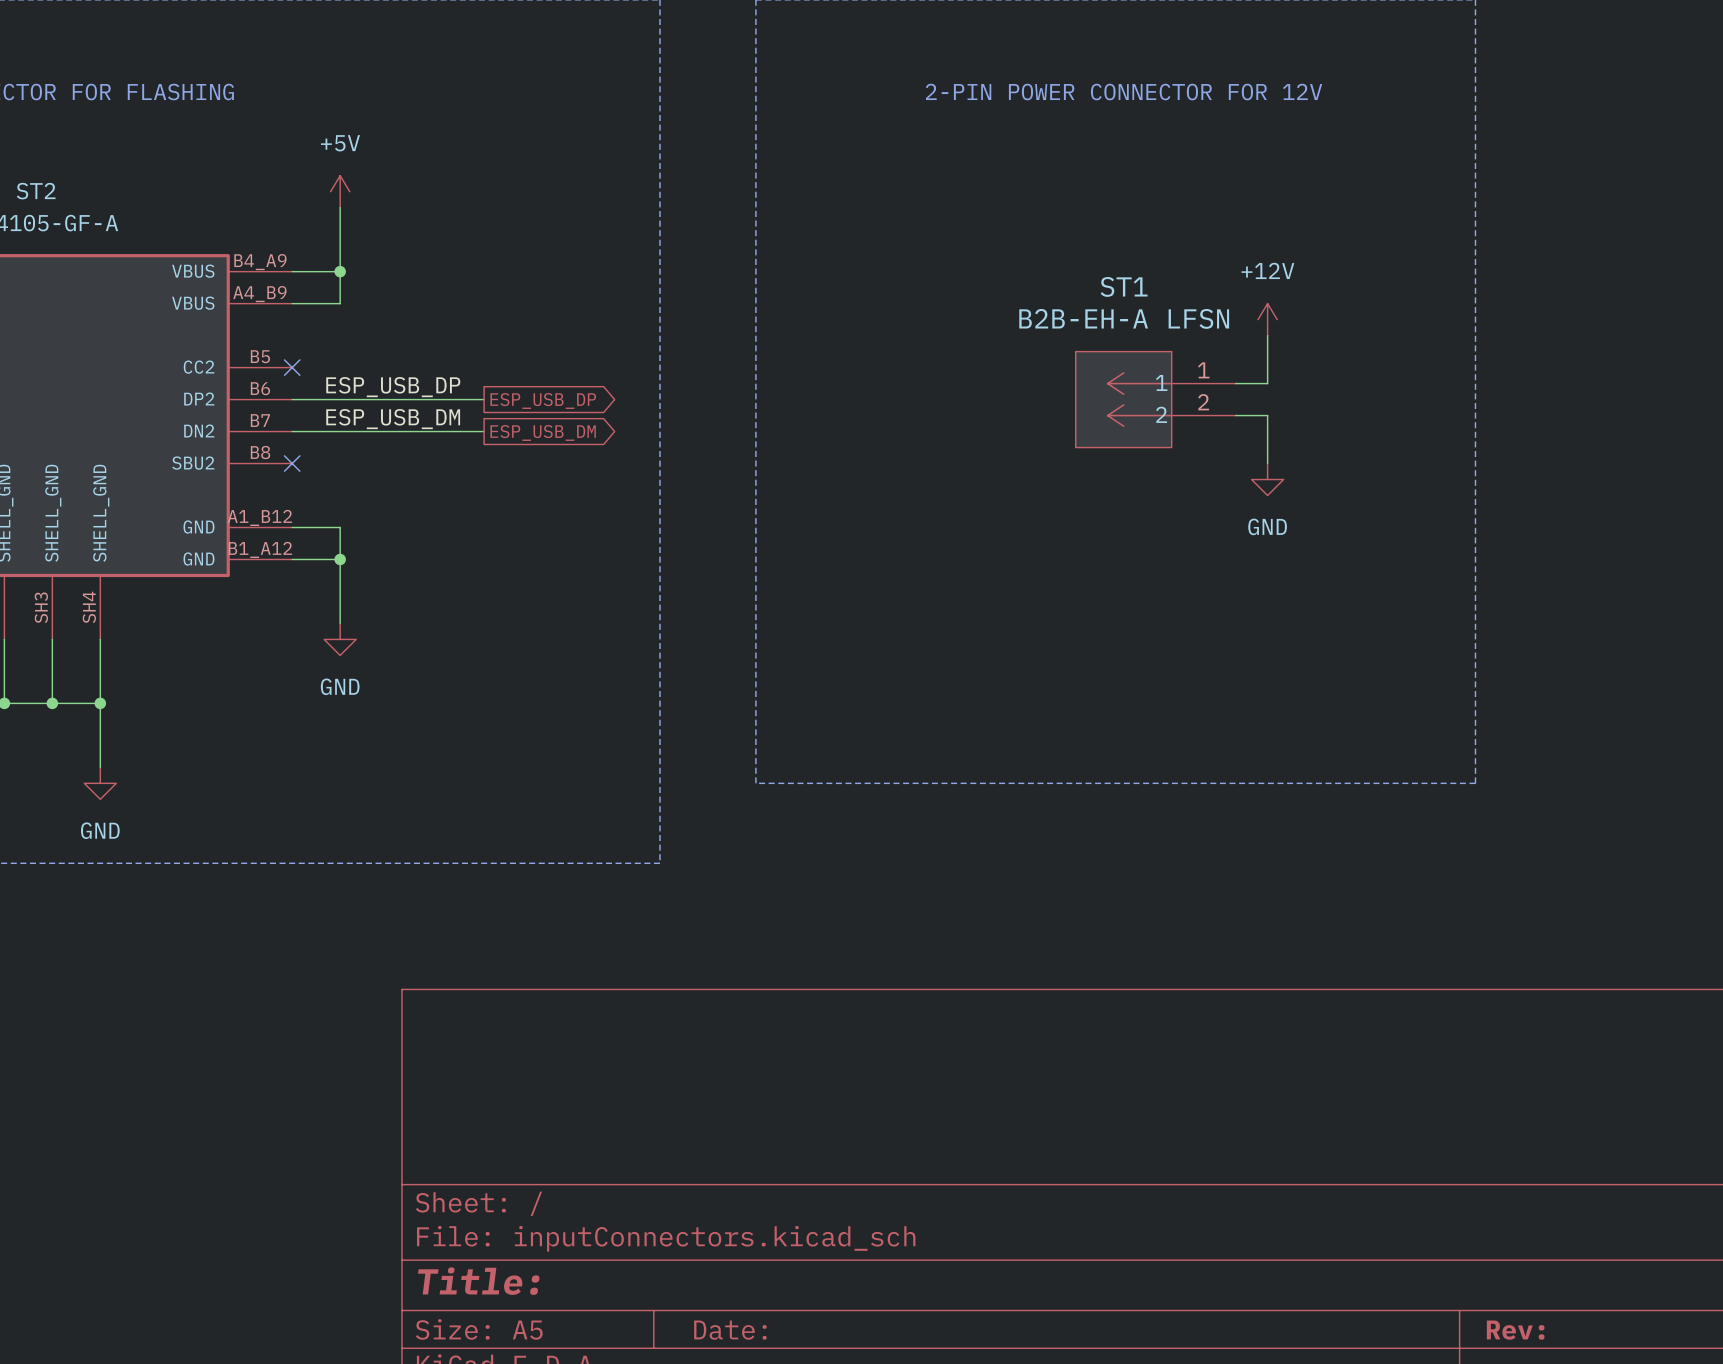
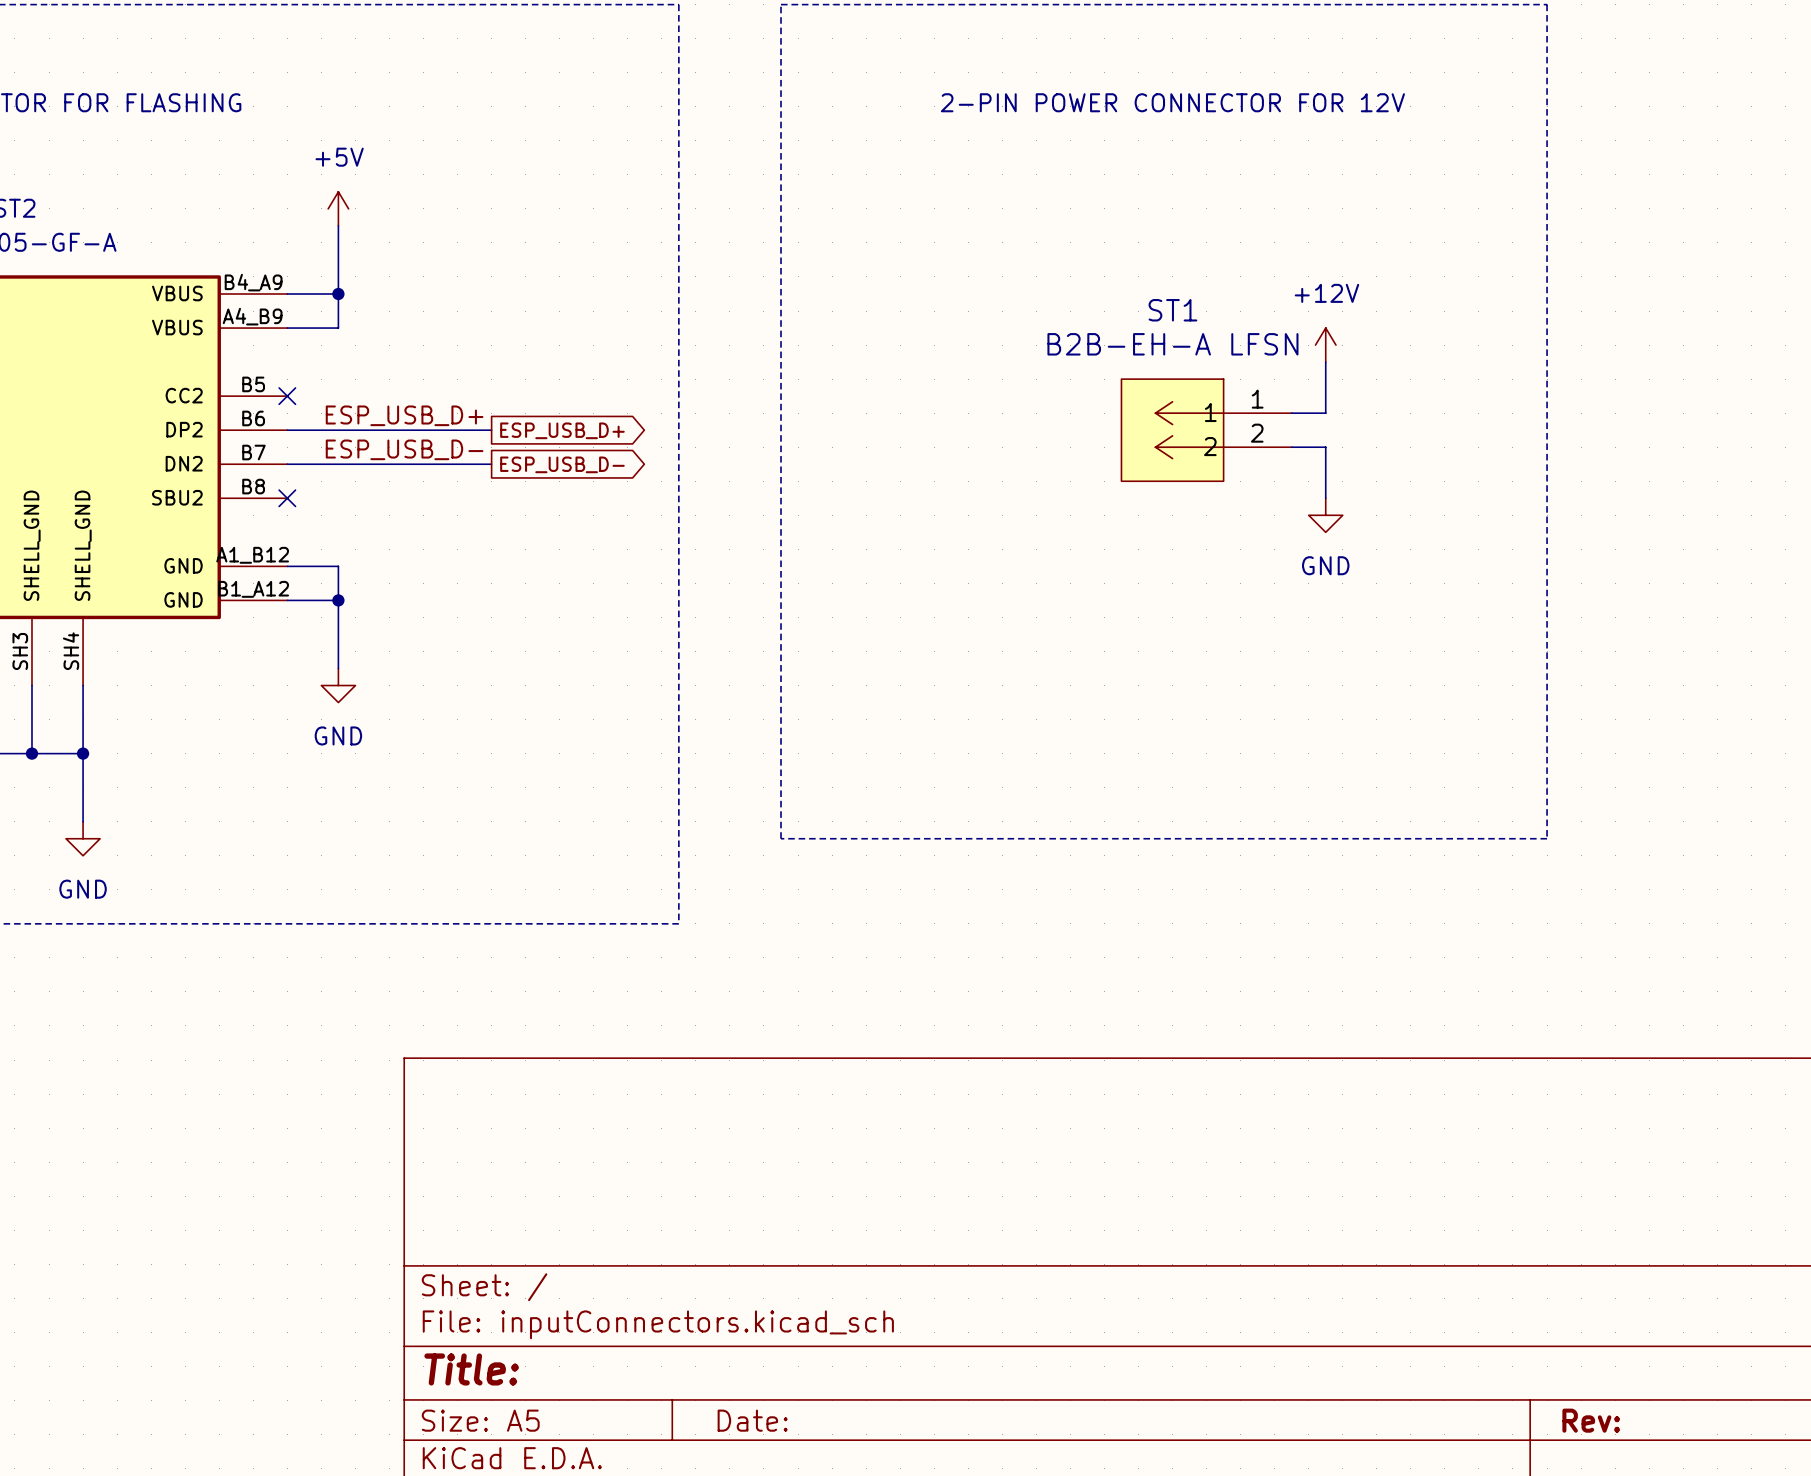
label: ESP_USB_DP (393, 387) -> ESP_USB_D+ (404, 415)
global label: ESP_USB_DP (543, 400) -> ESP_USB_D+ (562, 430)
label: ESP_USB_DM (393, 419) -> ESP_USB_D- (404, 449)
global label: ESP_USB_DM (543, 432) -> ESP_USB_D- (562, 464)

